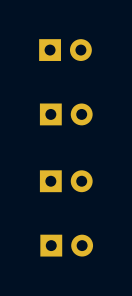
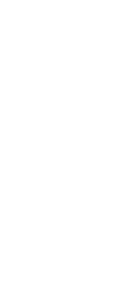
part: (65, 50) -> none
part: (66, 114) -> none
part: (66, 181) -> none
part: (66, 245) -> none

